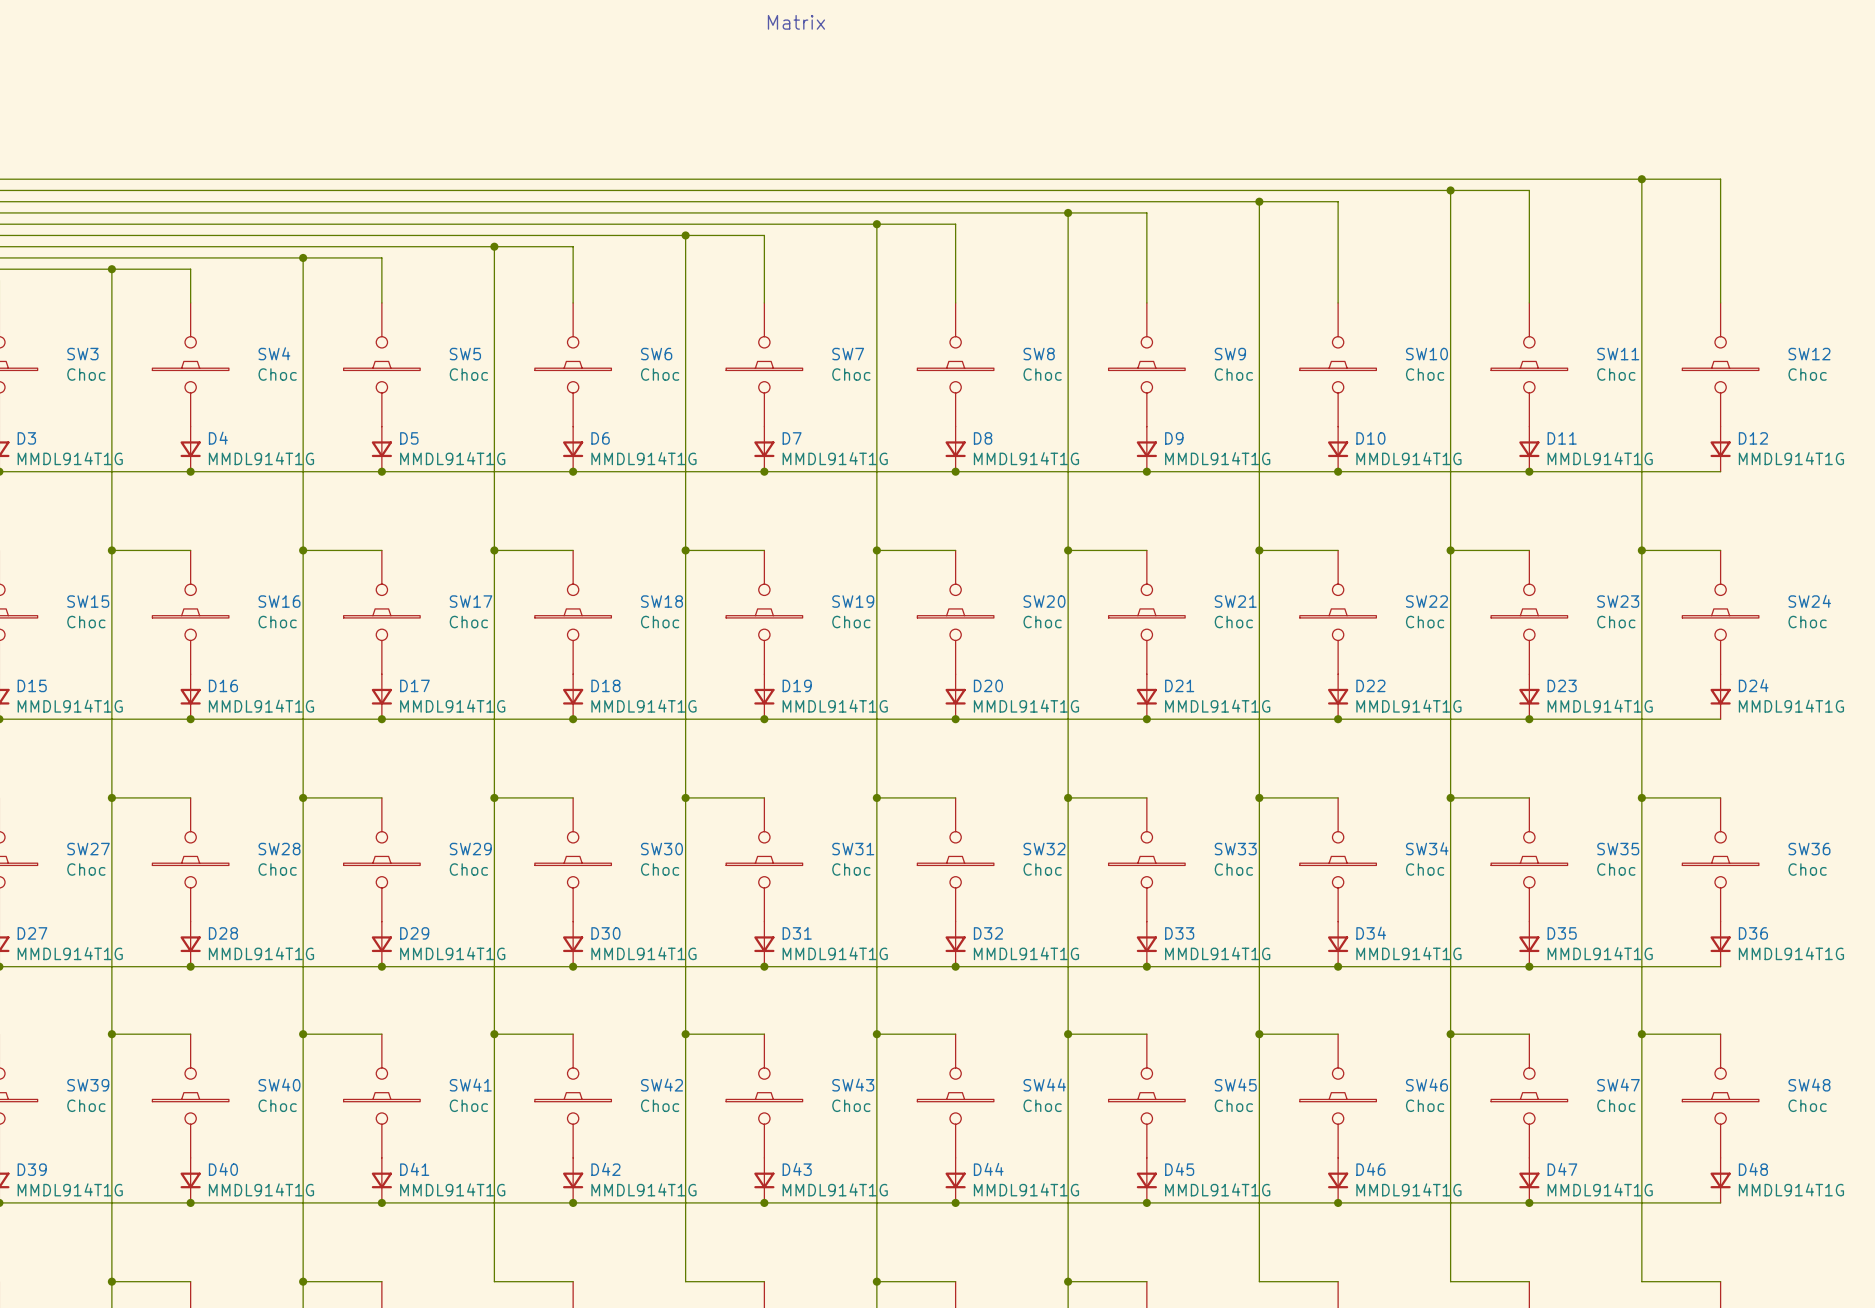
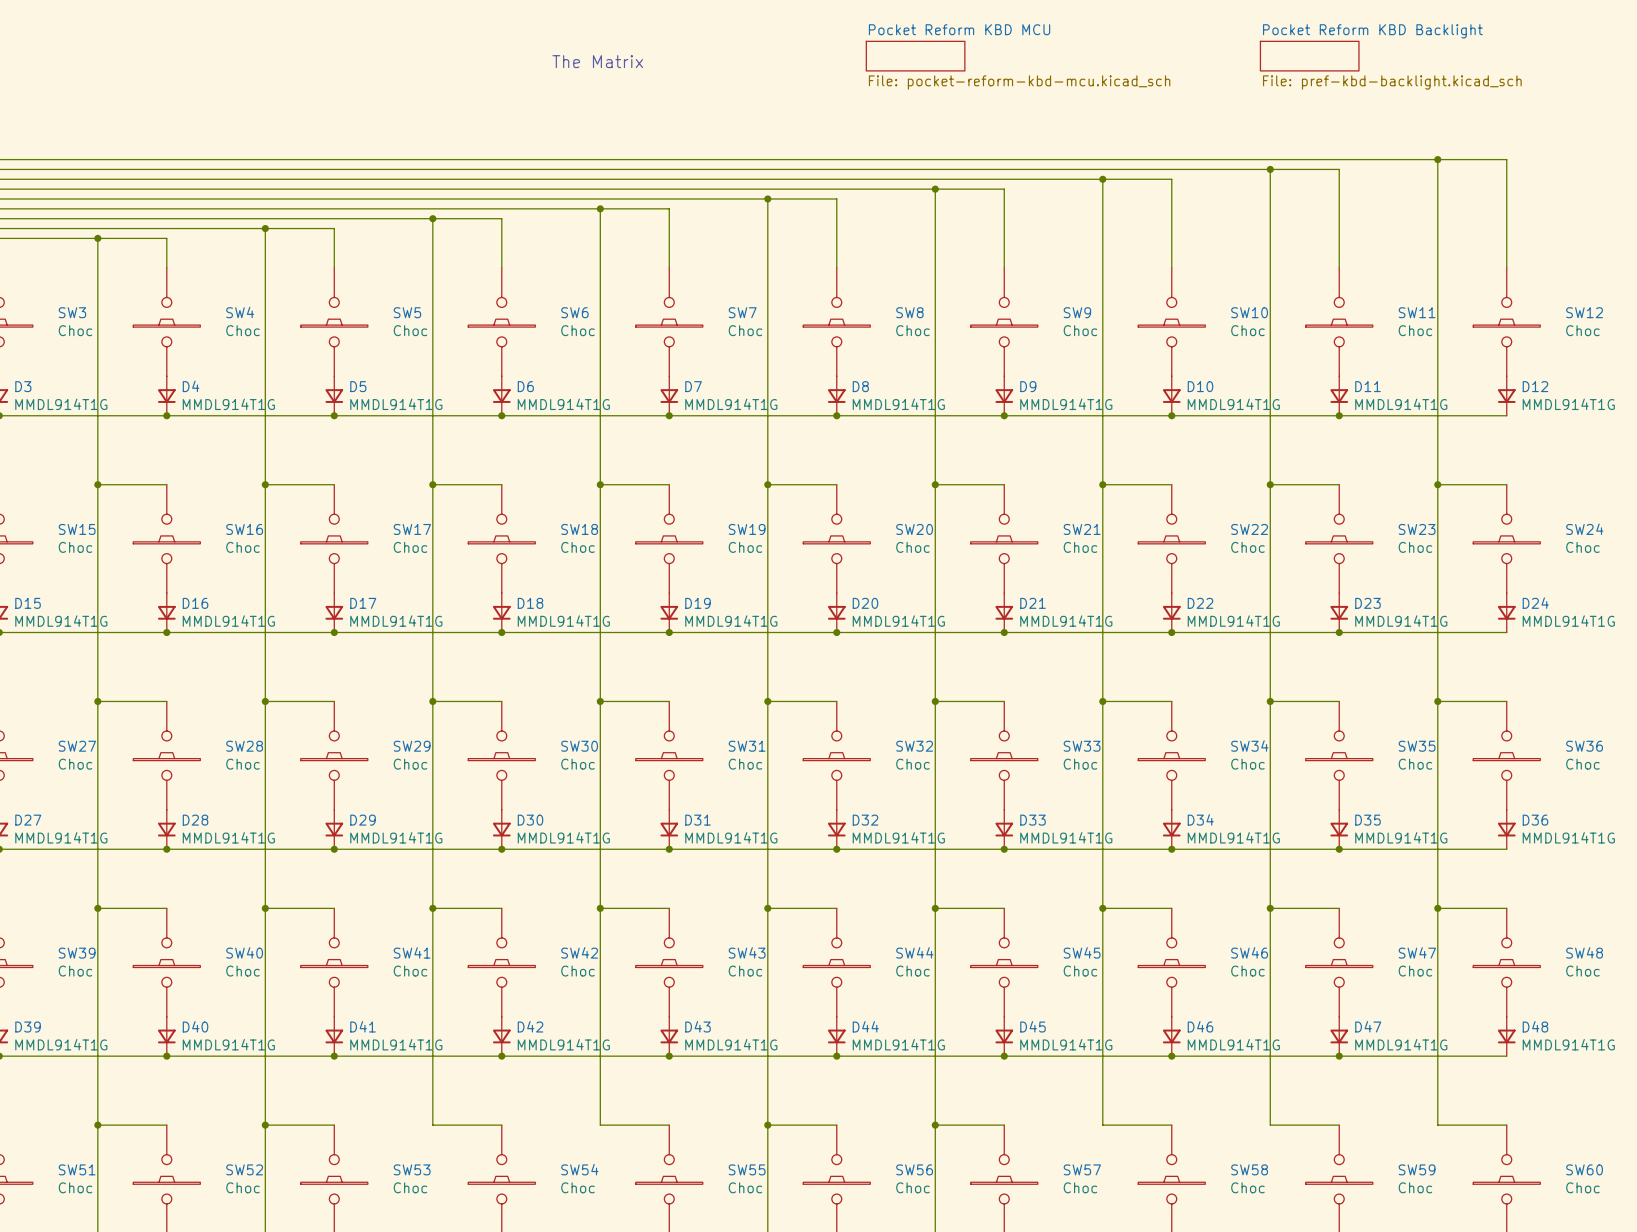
text: Matrix (796, 22) -> none
sheet Pocket Reform KBD MCU: none -> File: pocket-reform-kbd-mcu.kicad_sch (915, 56)
sheet Pocket Reform KBD Backlight: none -> File: pref-kbd-backlight.kicad_sch (1309, 56)
text: none -> The Matrix (597, 61)

